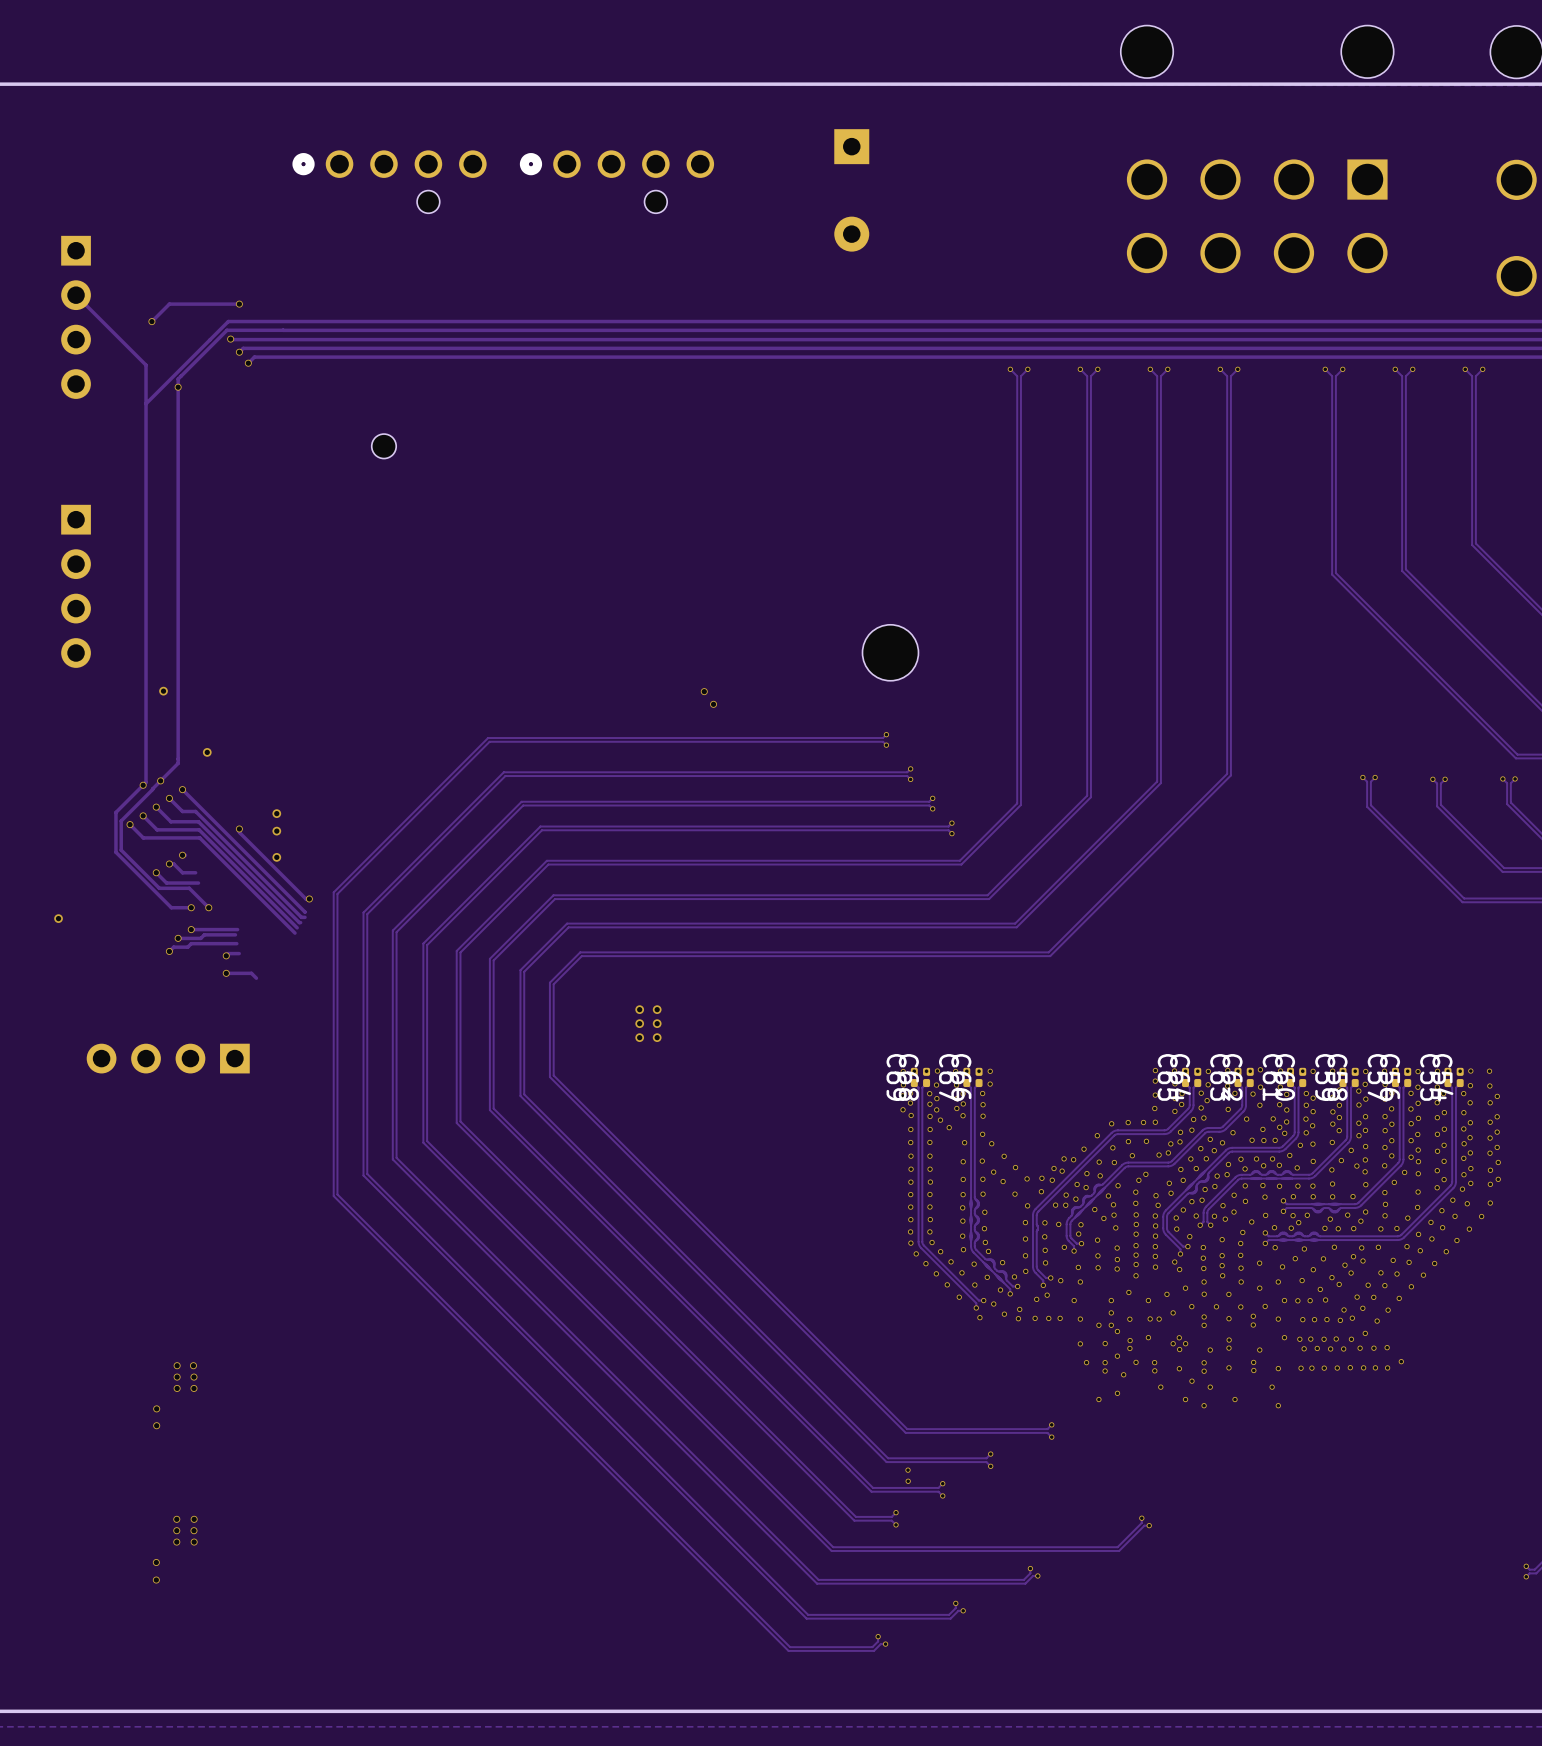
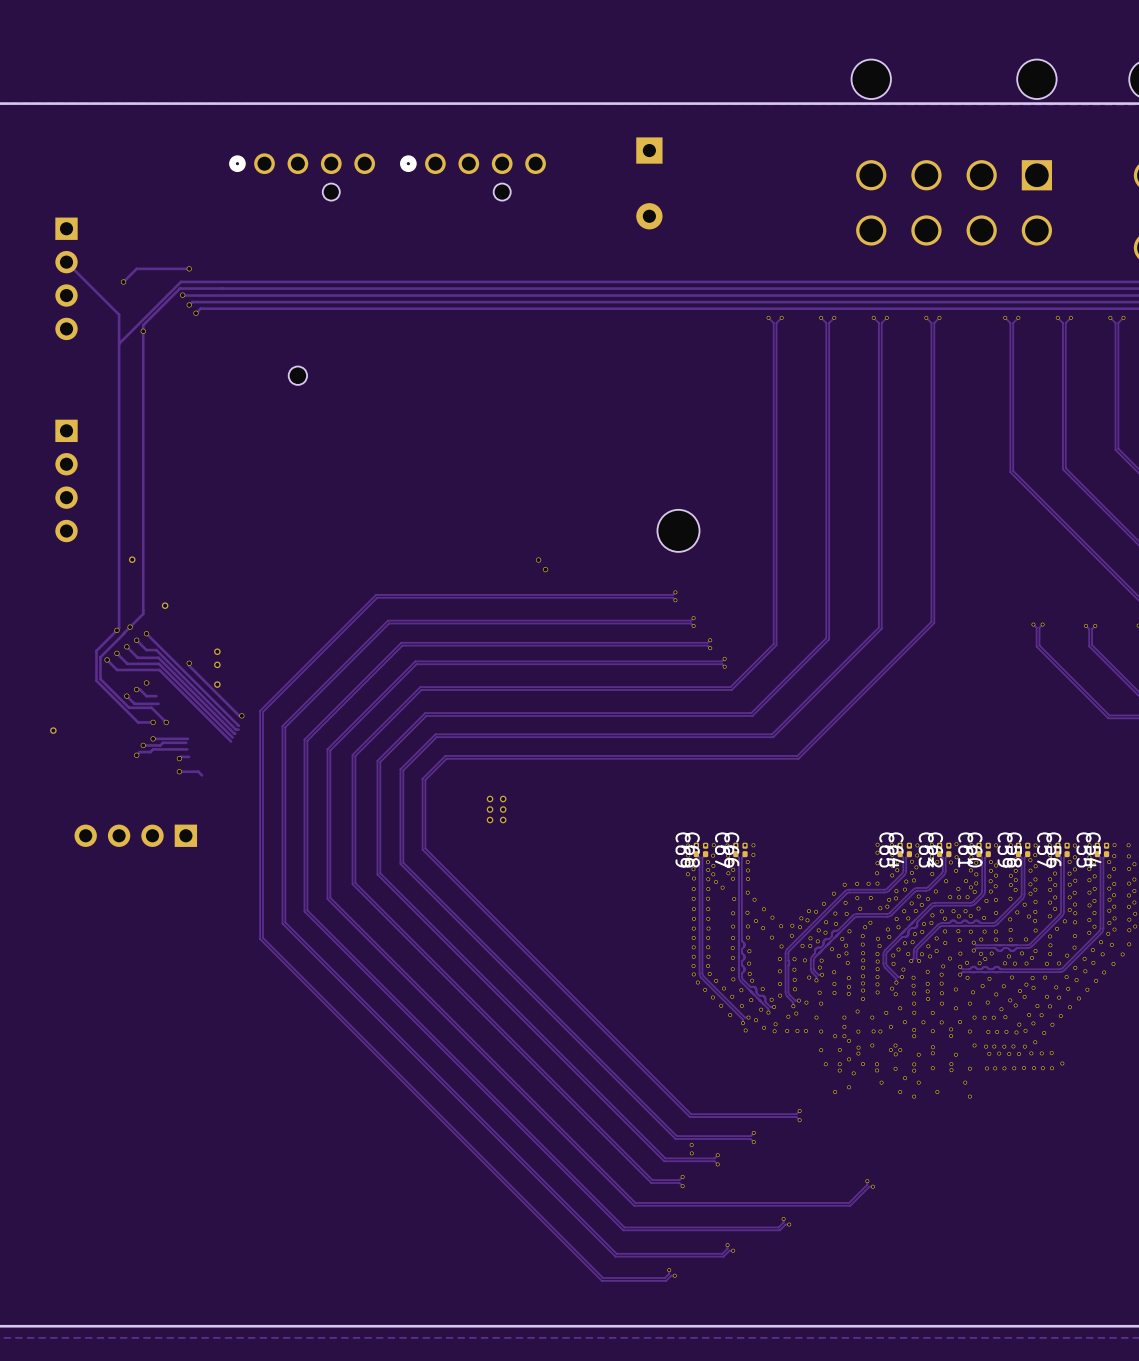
via: (177, 1365) -> none
via: (193, 1365) -> none
via: (177, 1377) -> none
via: (193, 1377) -> none
via: (177, 1388) -> none
via: (193, 1388) -> none
via: (156, 1408) -> none
via: (156, 1425) -> none
via: (176, 1519) -> none
via: (194, 1519) -> none
via: (176, 1530) -> none
via: (193, 1530) -> none
via: (176, 1542) -> none
via: (194, 1542) -> none
via: (156, 1562) -> none
via: (156, 1580) -> none

